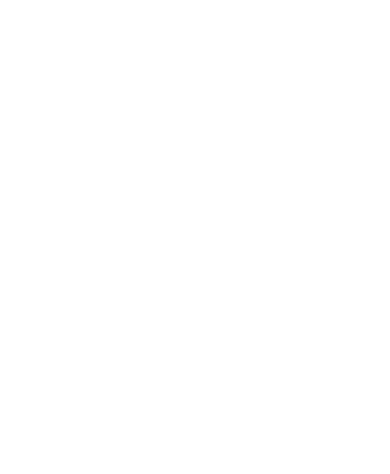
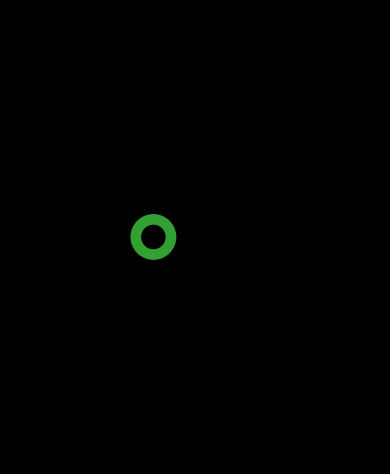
via: none -> (153, 236)

